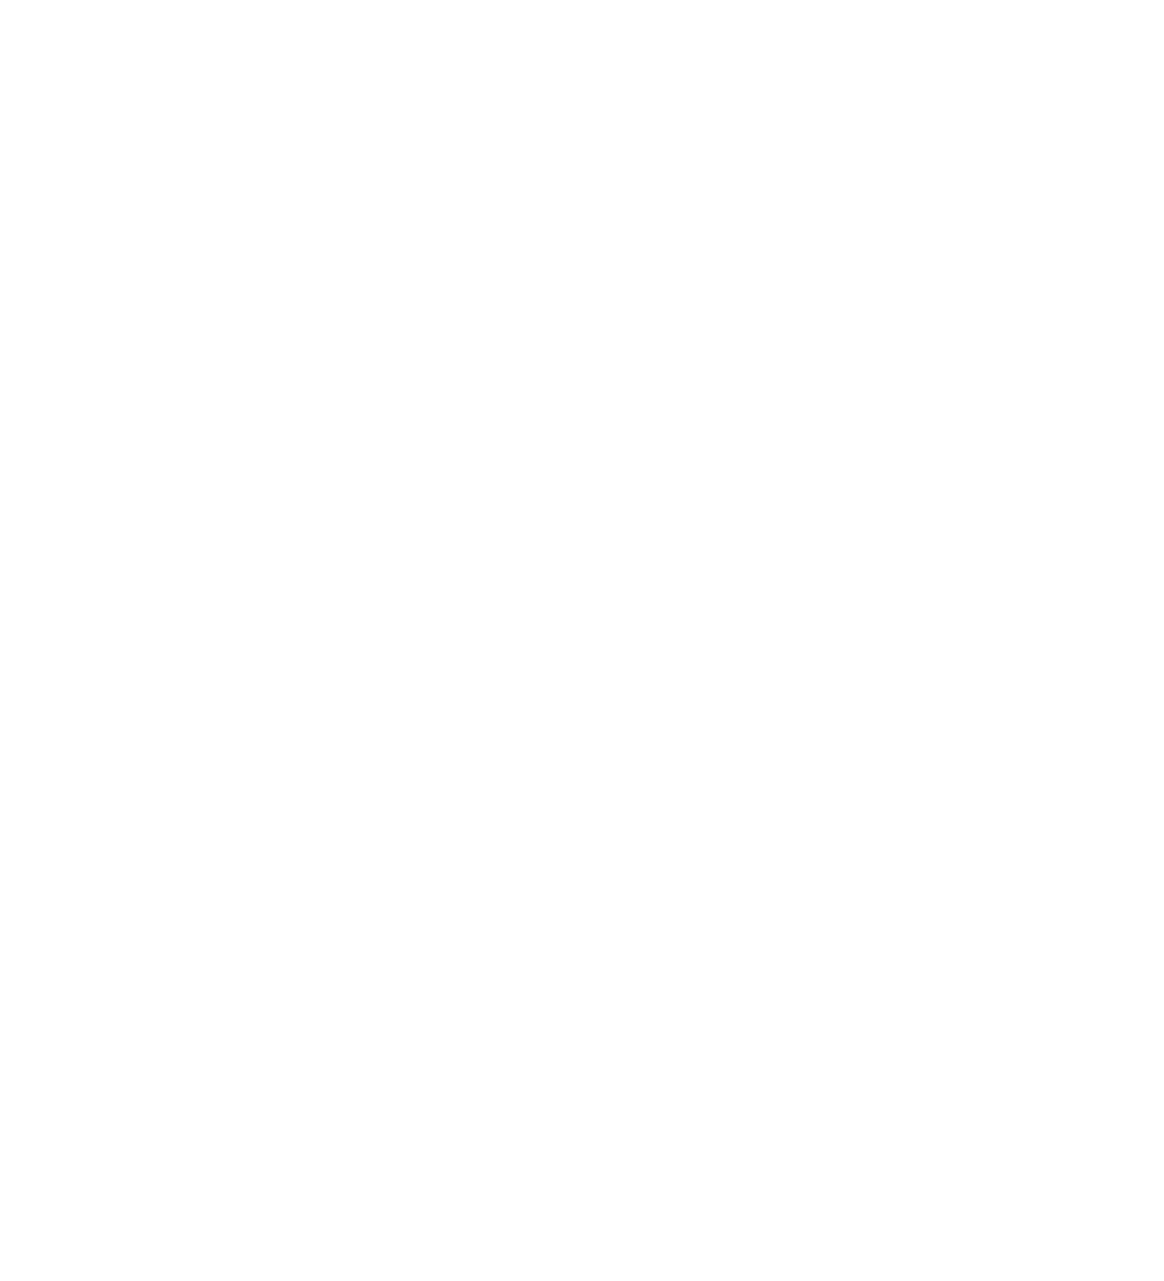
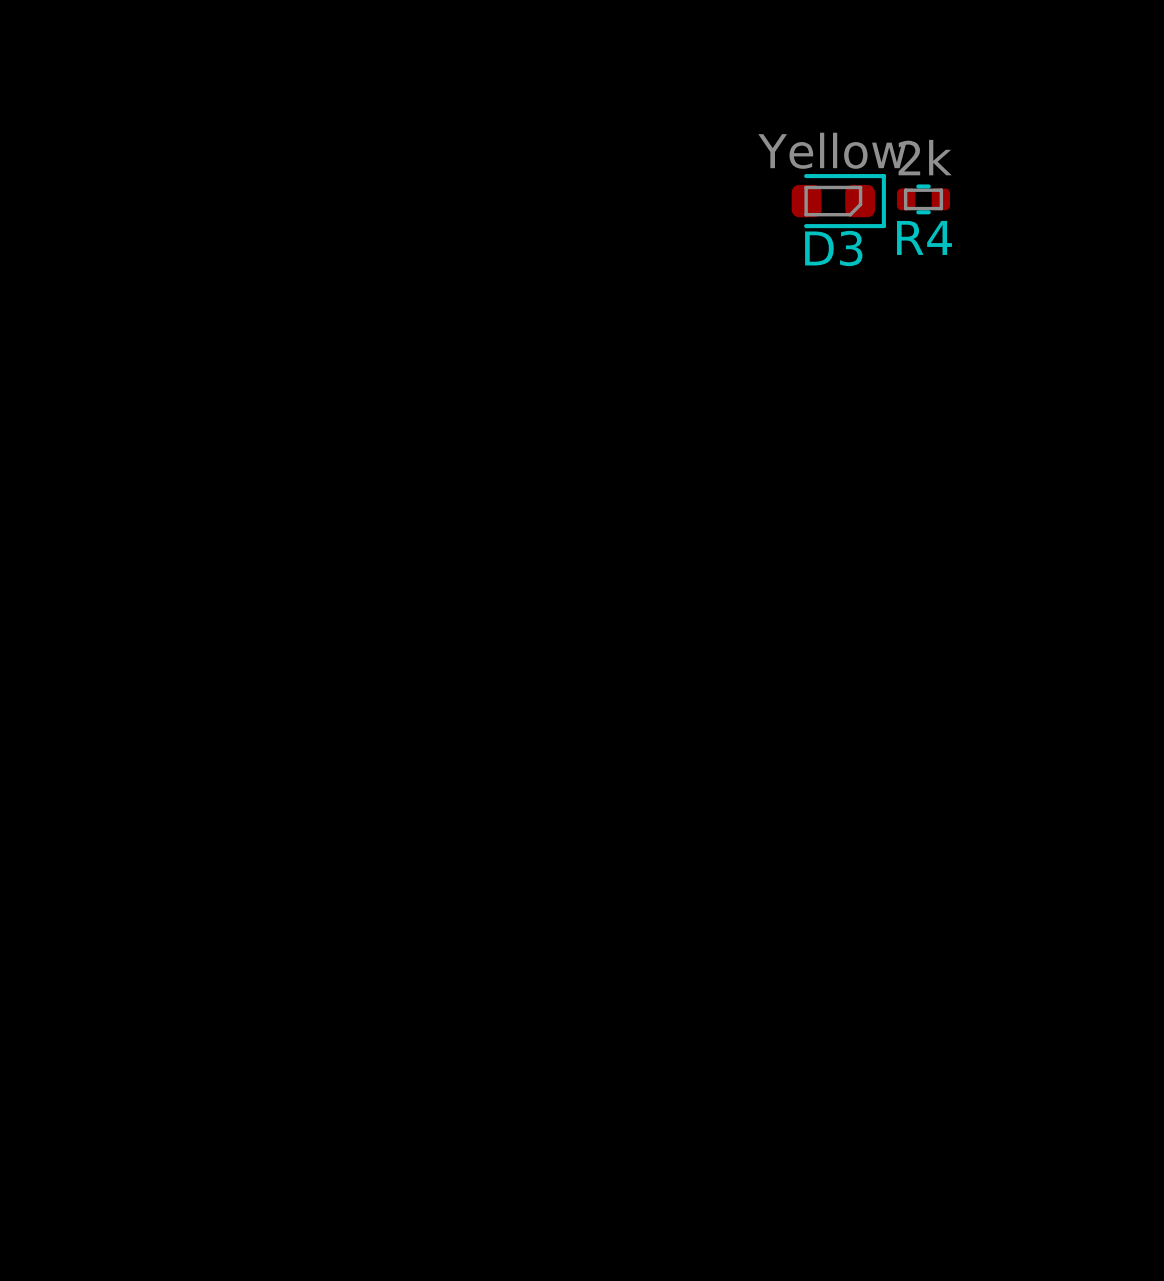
R4: none -> 2k (923, 199)
D3: none -> Yellow (838, 201)

